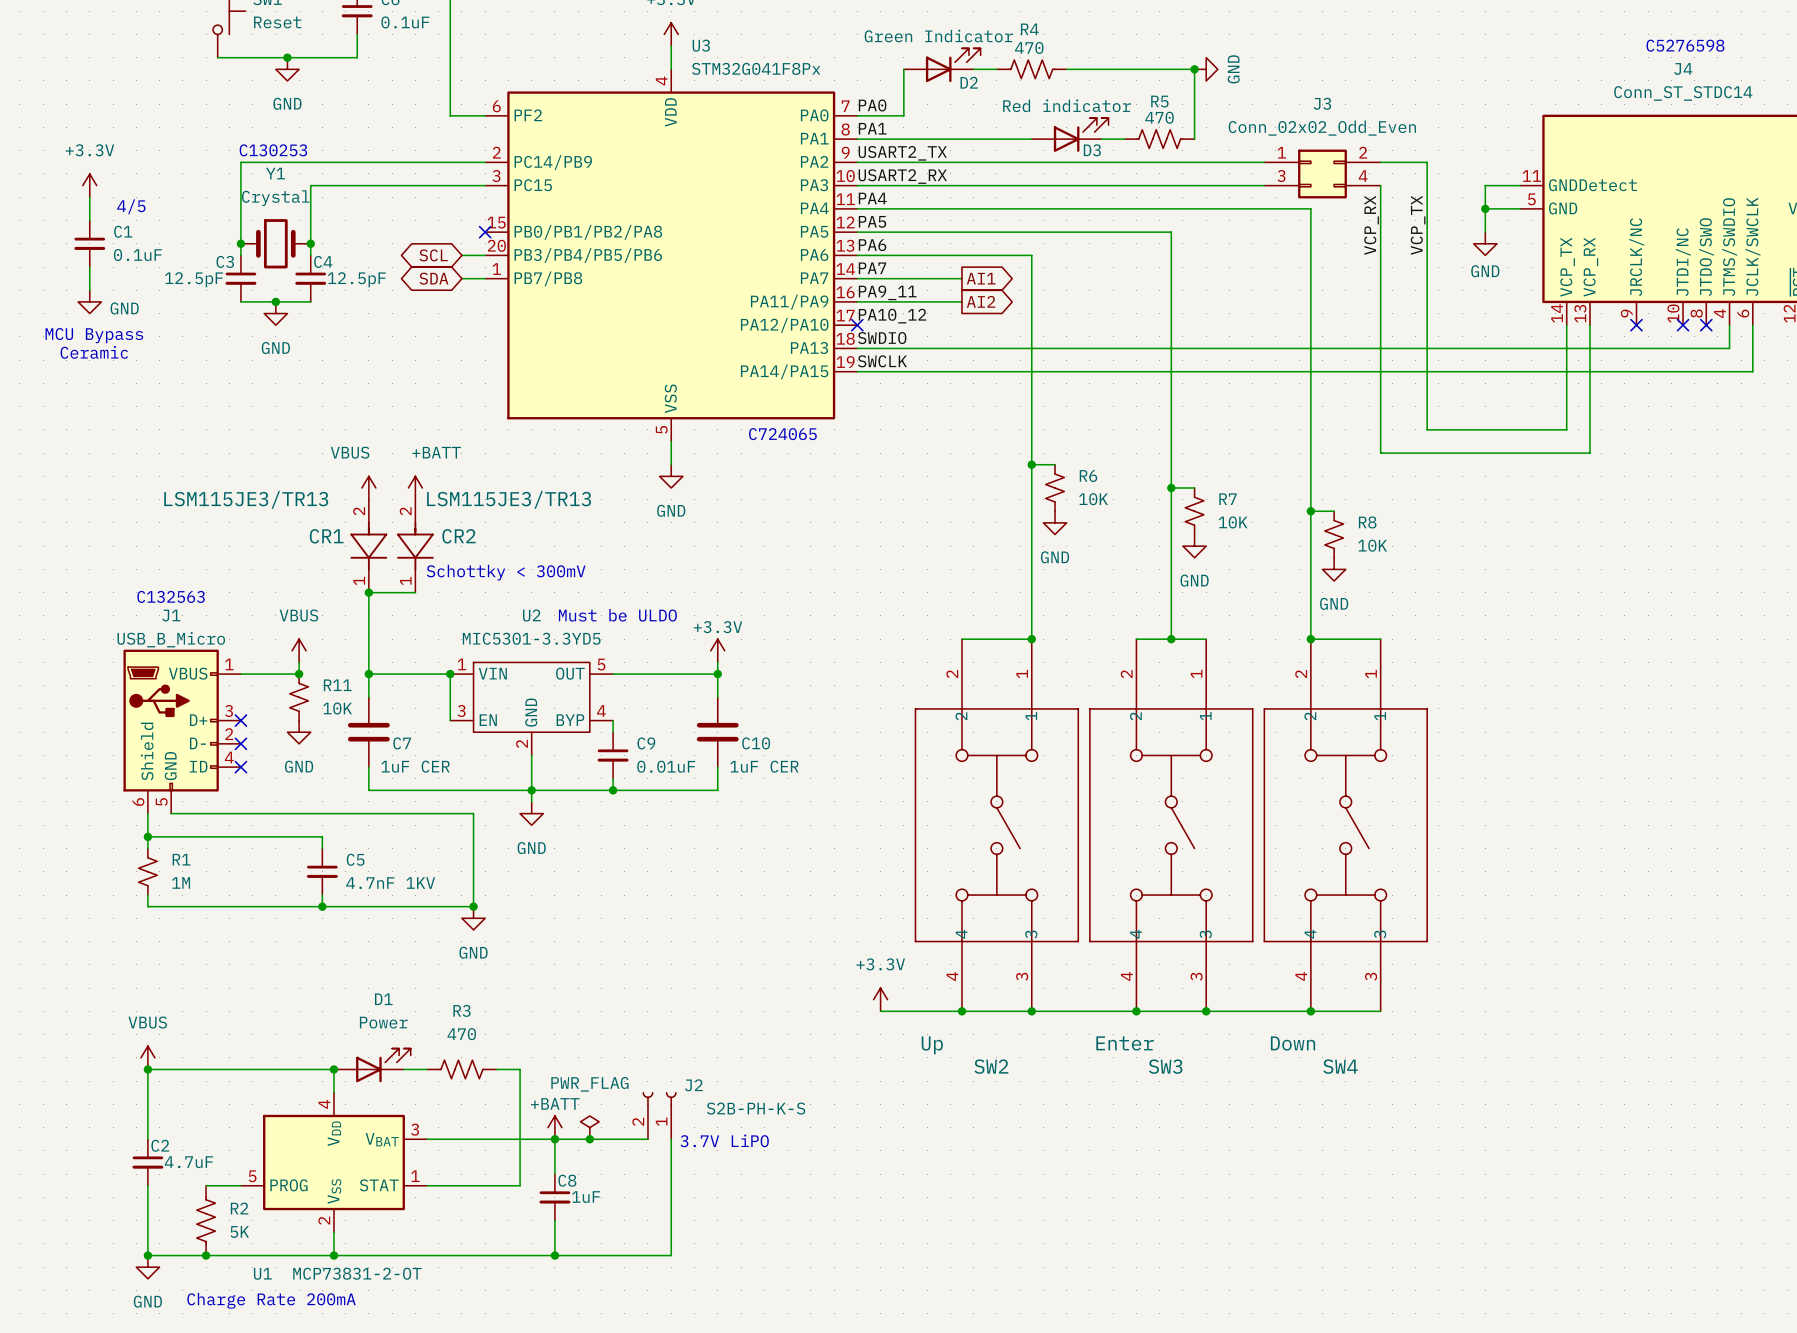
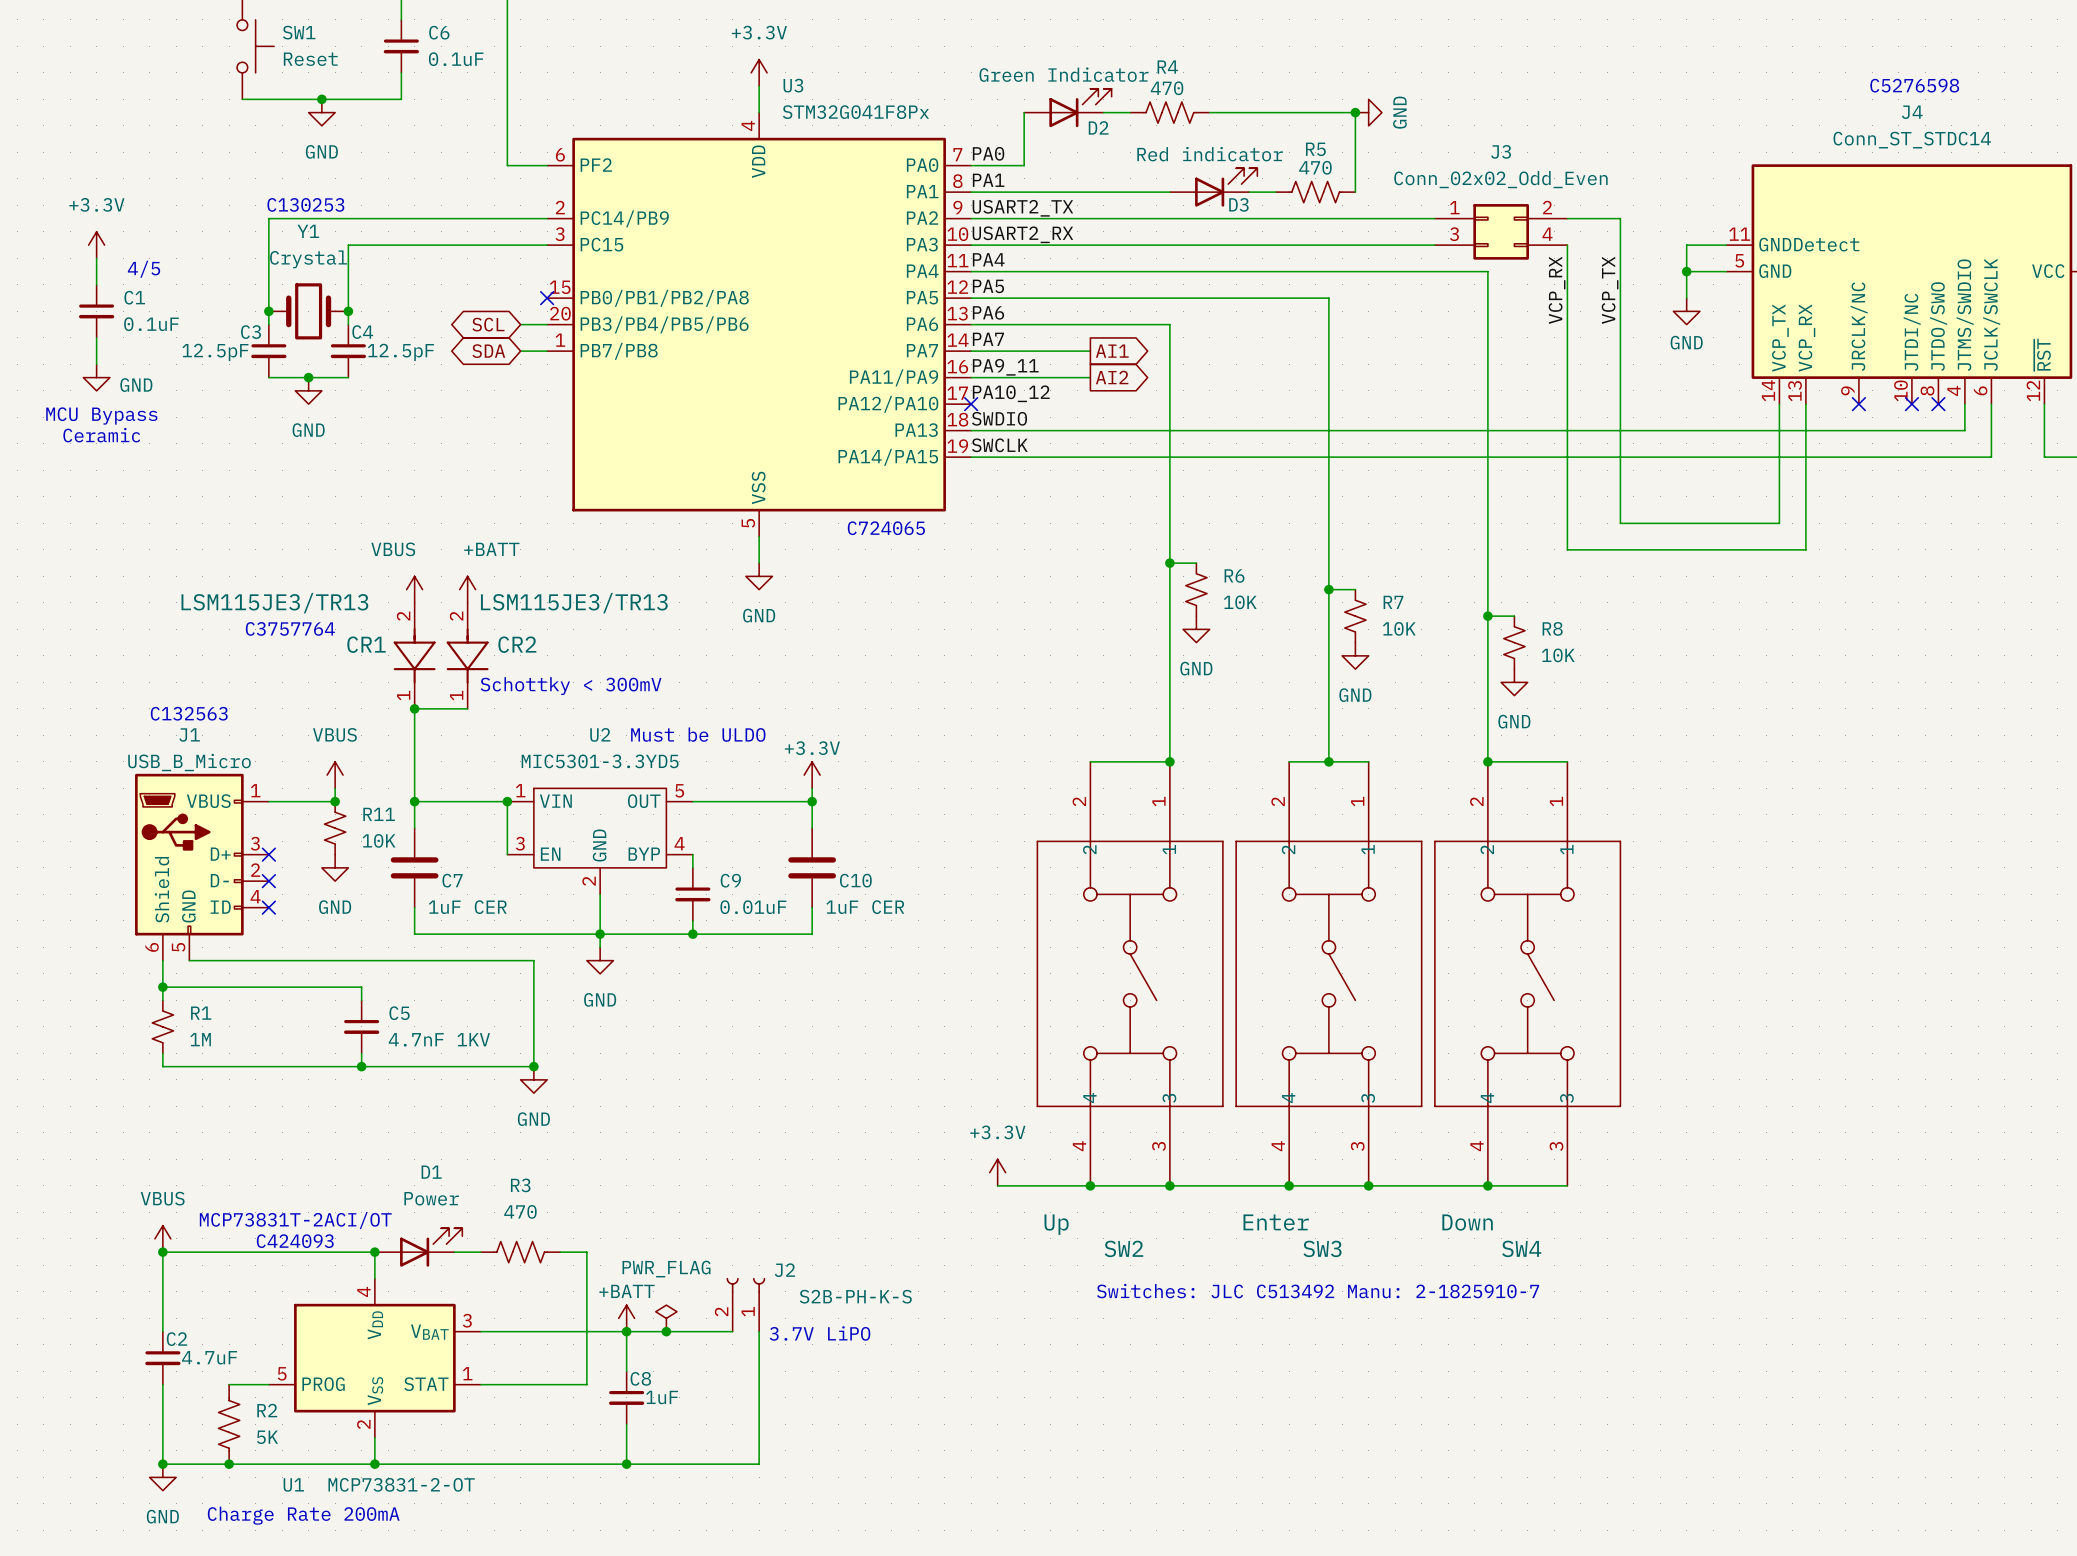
text: none -> C3757764 (290, 628)
text: none -> MCP73831T-2ACI/OT (295, 1220)
text: none -> C424093 (295, 1241)
text: none -> Switches: JLC C513492 Manu: 2-1825910-7 (1318, 1291)

